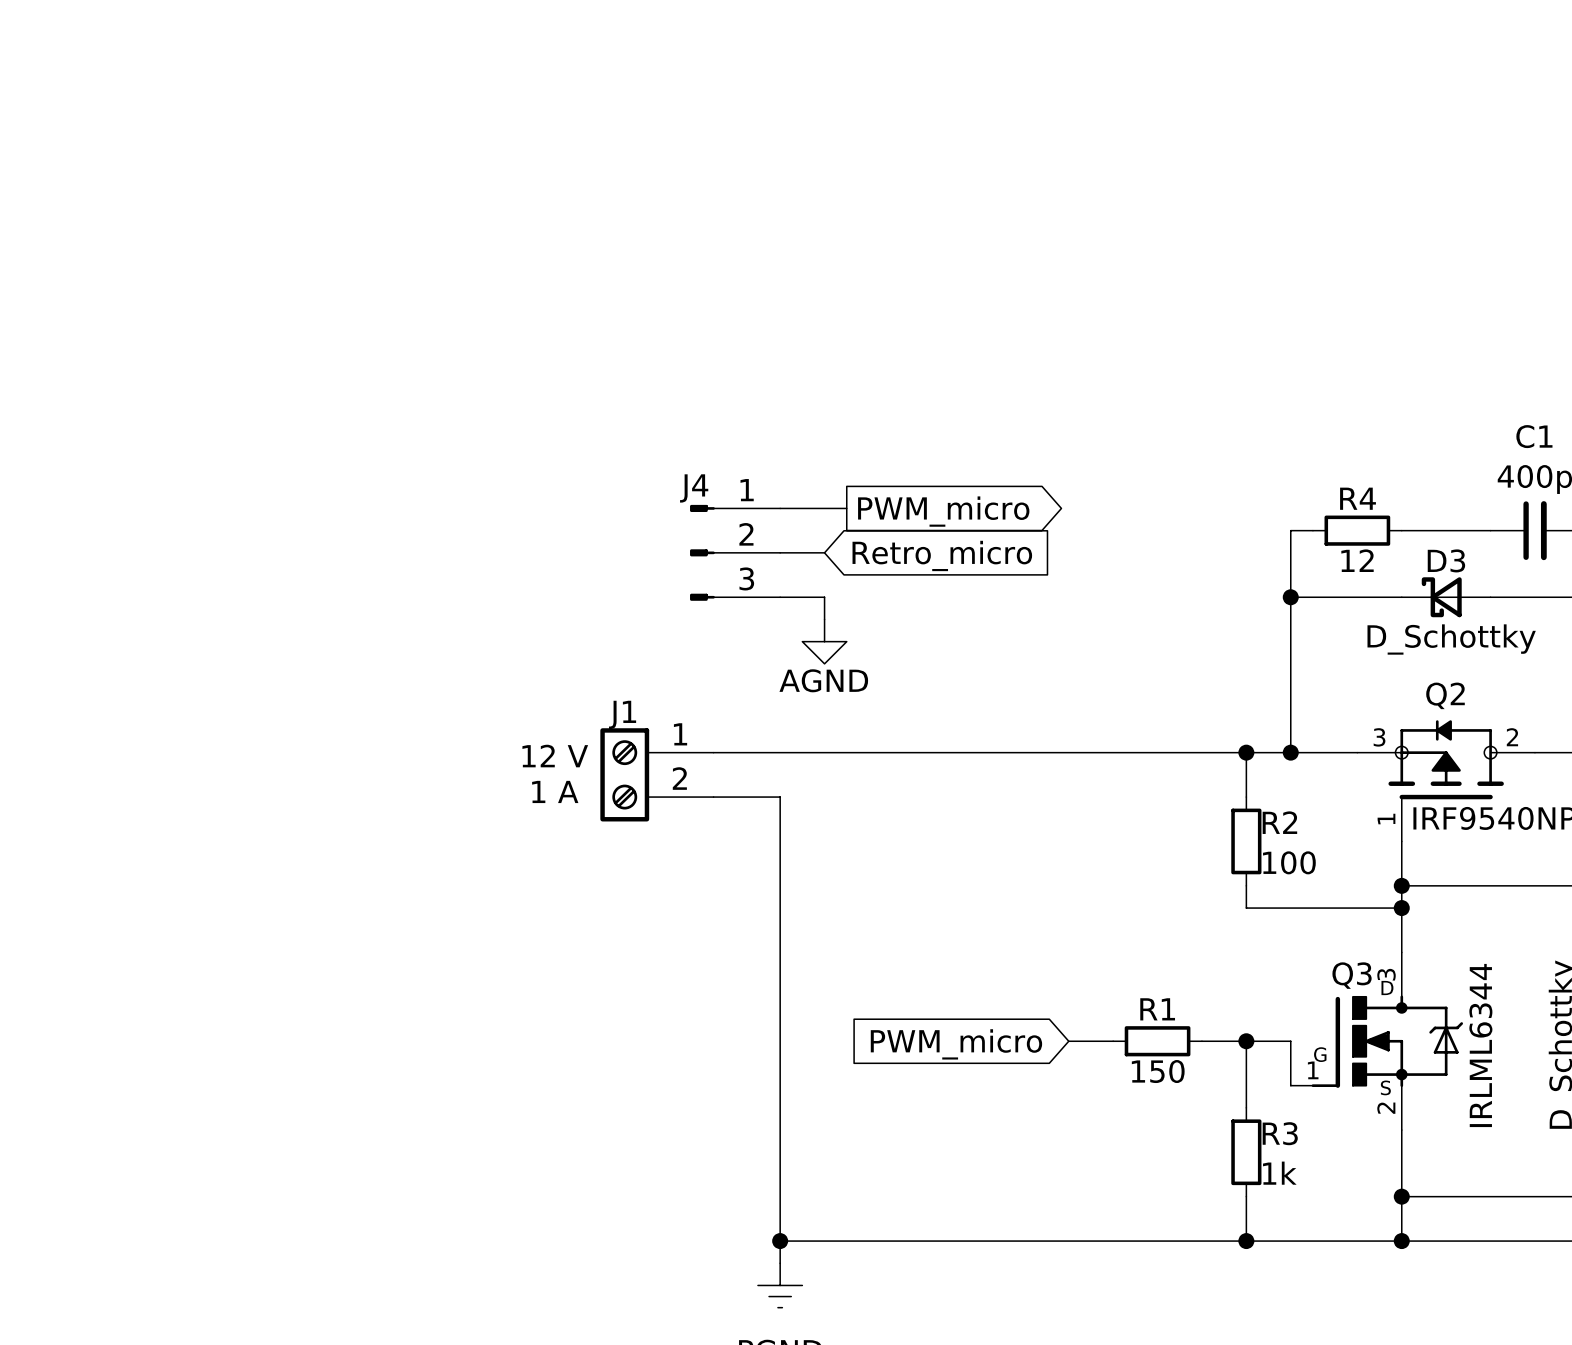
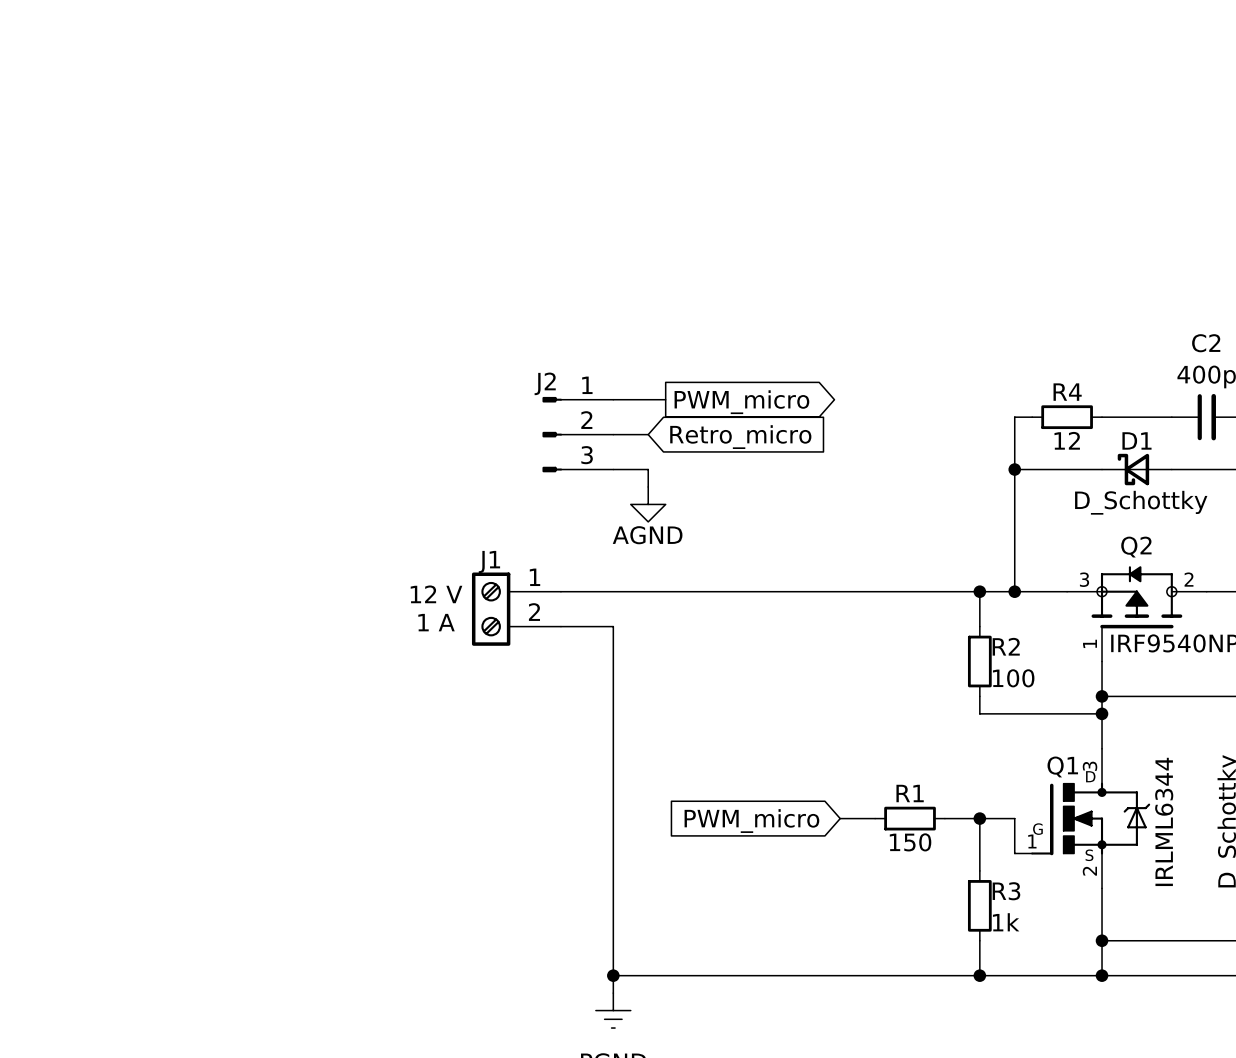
C1 name: C1 (1534, 436) -> C2 (1206, 343)
J4 name: J4 (694, 488) -> J2 (545, 383)
D3 name: D3 (1446, 560) -> D1 (1136, 440)
Q3 name: Q3 (1352, 975) -> Q1 (1062, 766)

